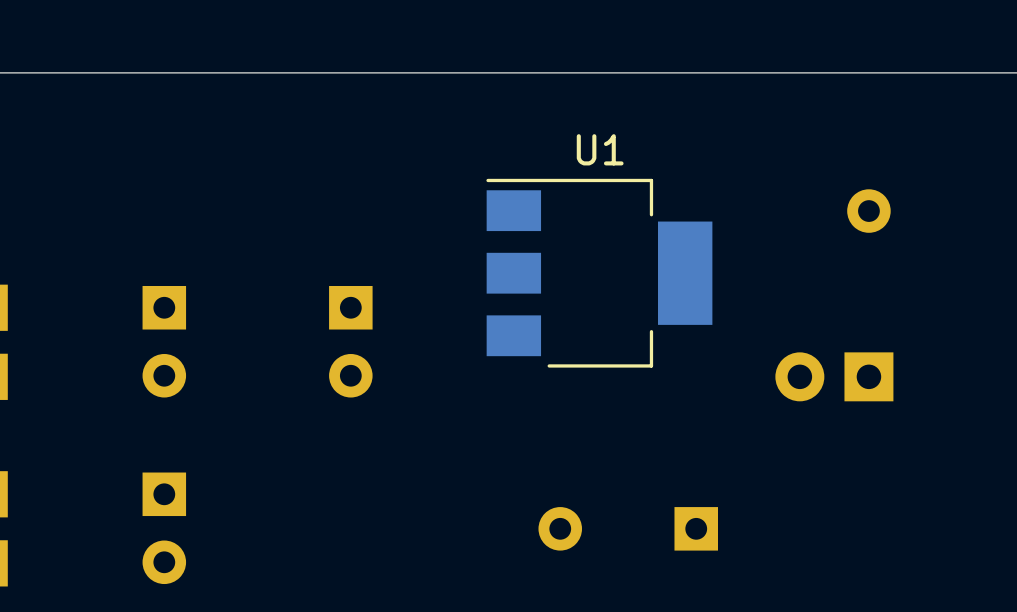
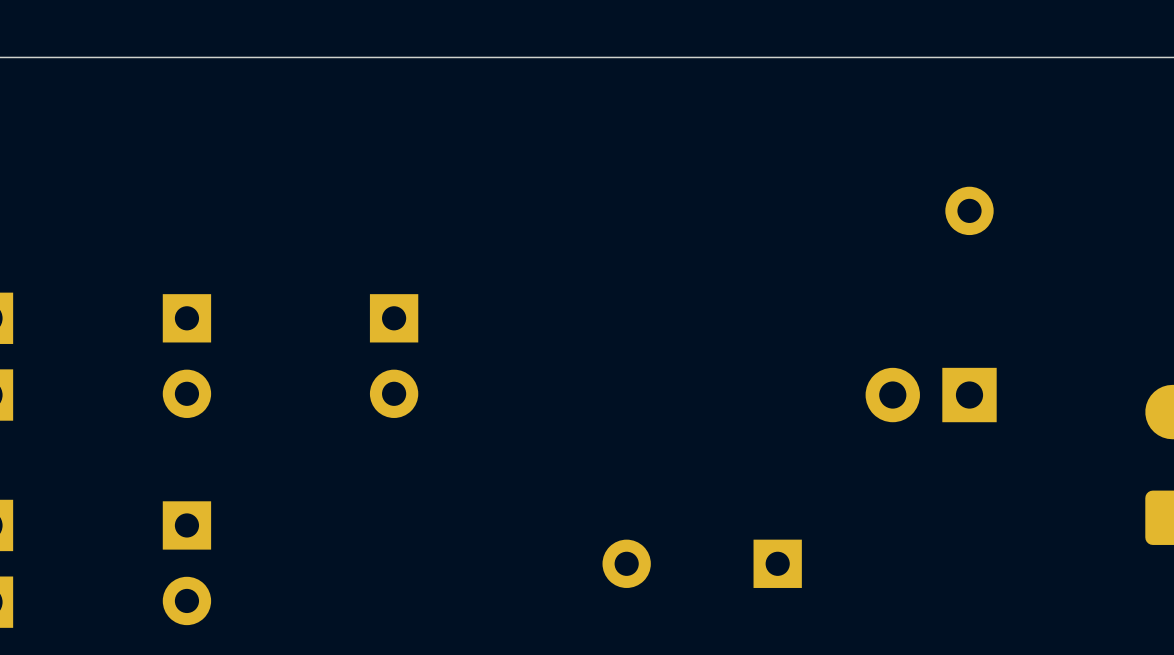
U1: (599, 273) -> none

